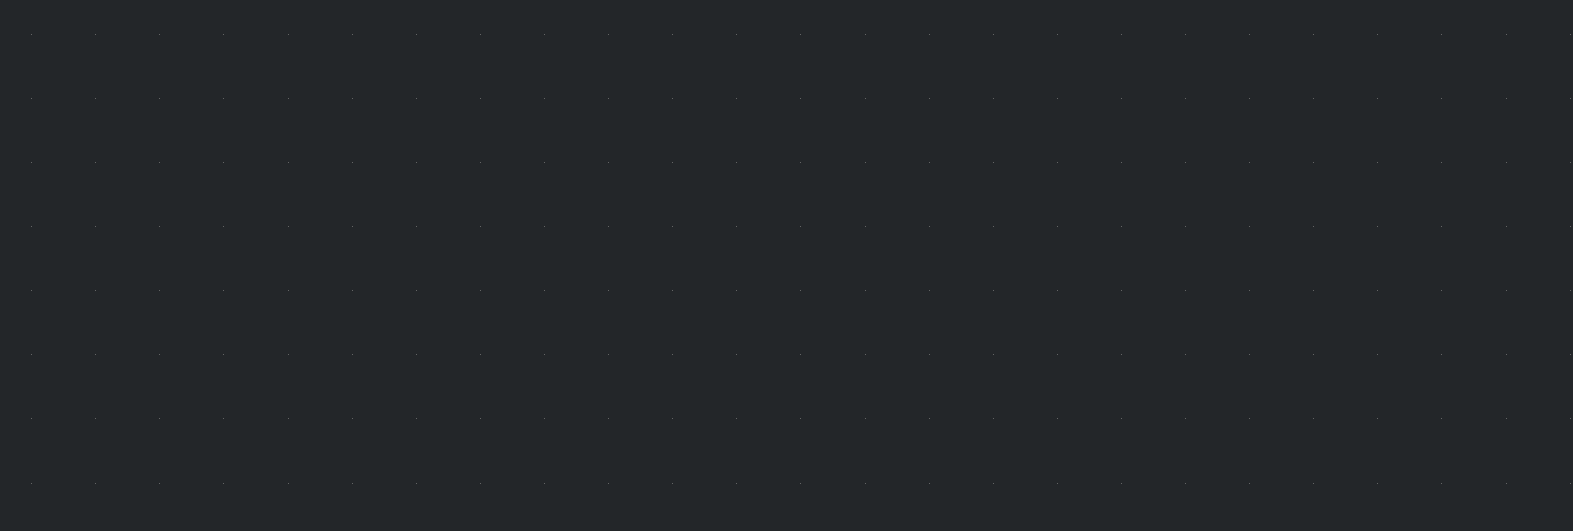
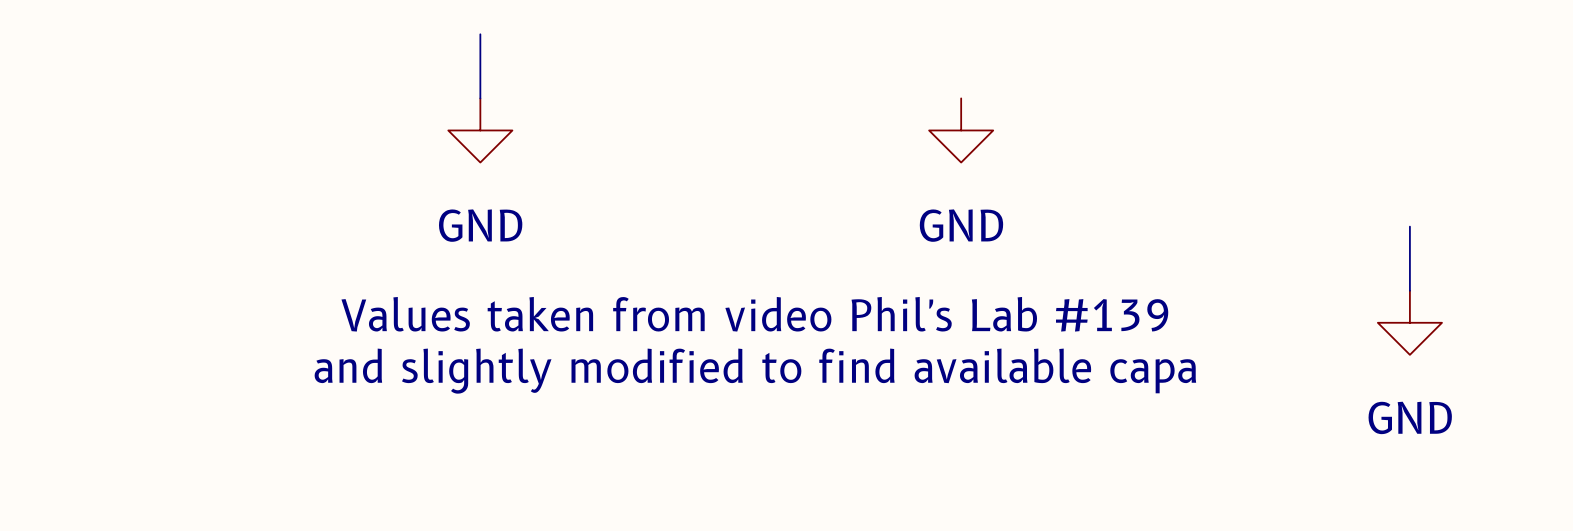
wire: none -> (480, 34) (480, 98)
power symbol: none -> GND (480, 130)
power symbol: none -> GND (961, 130)
wire: none -> (1409, 226) (1409, 290)
text: none -> Values taken from video Phil's Lab #139 (754, 314)
power symbol: none -> GND (1409, 322)
text: none -> and slightly modified to find available capa (755, 371)

